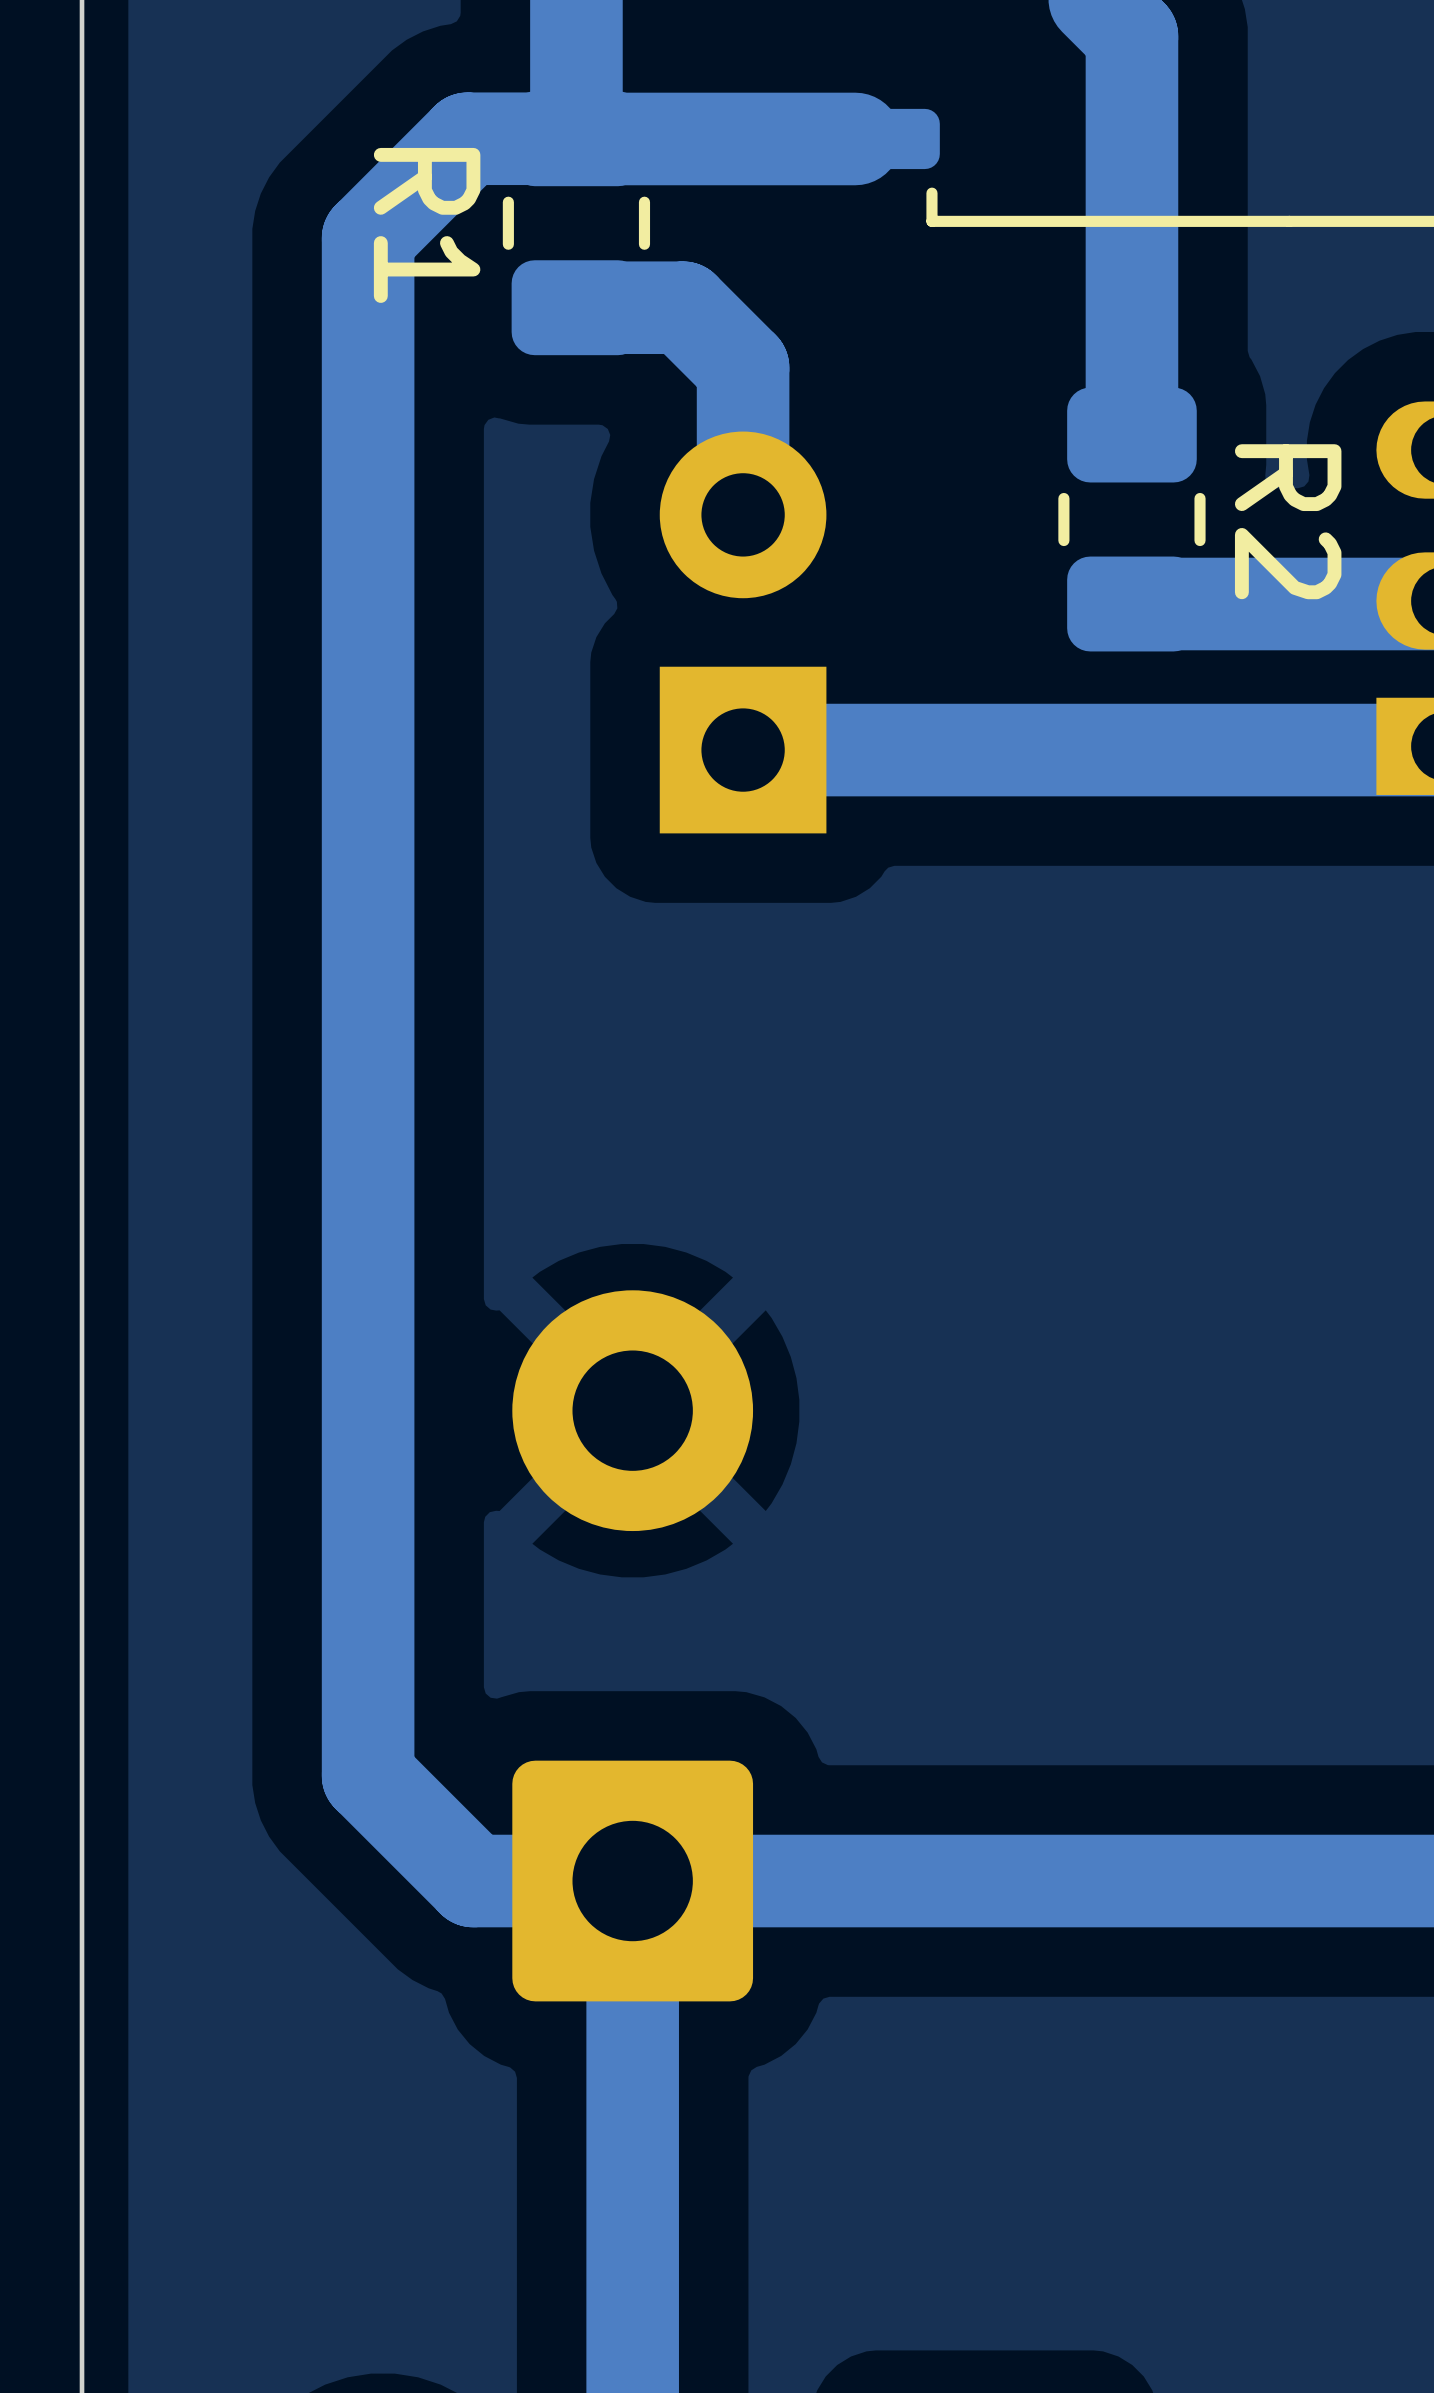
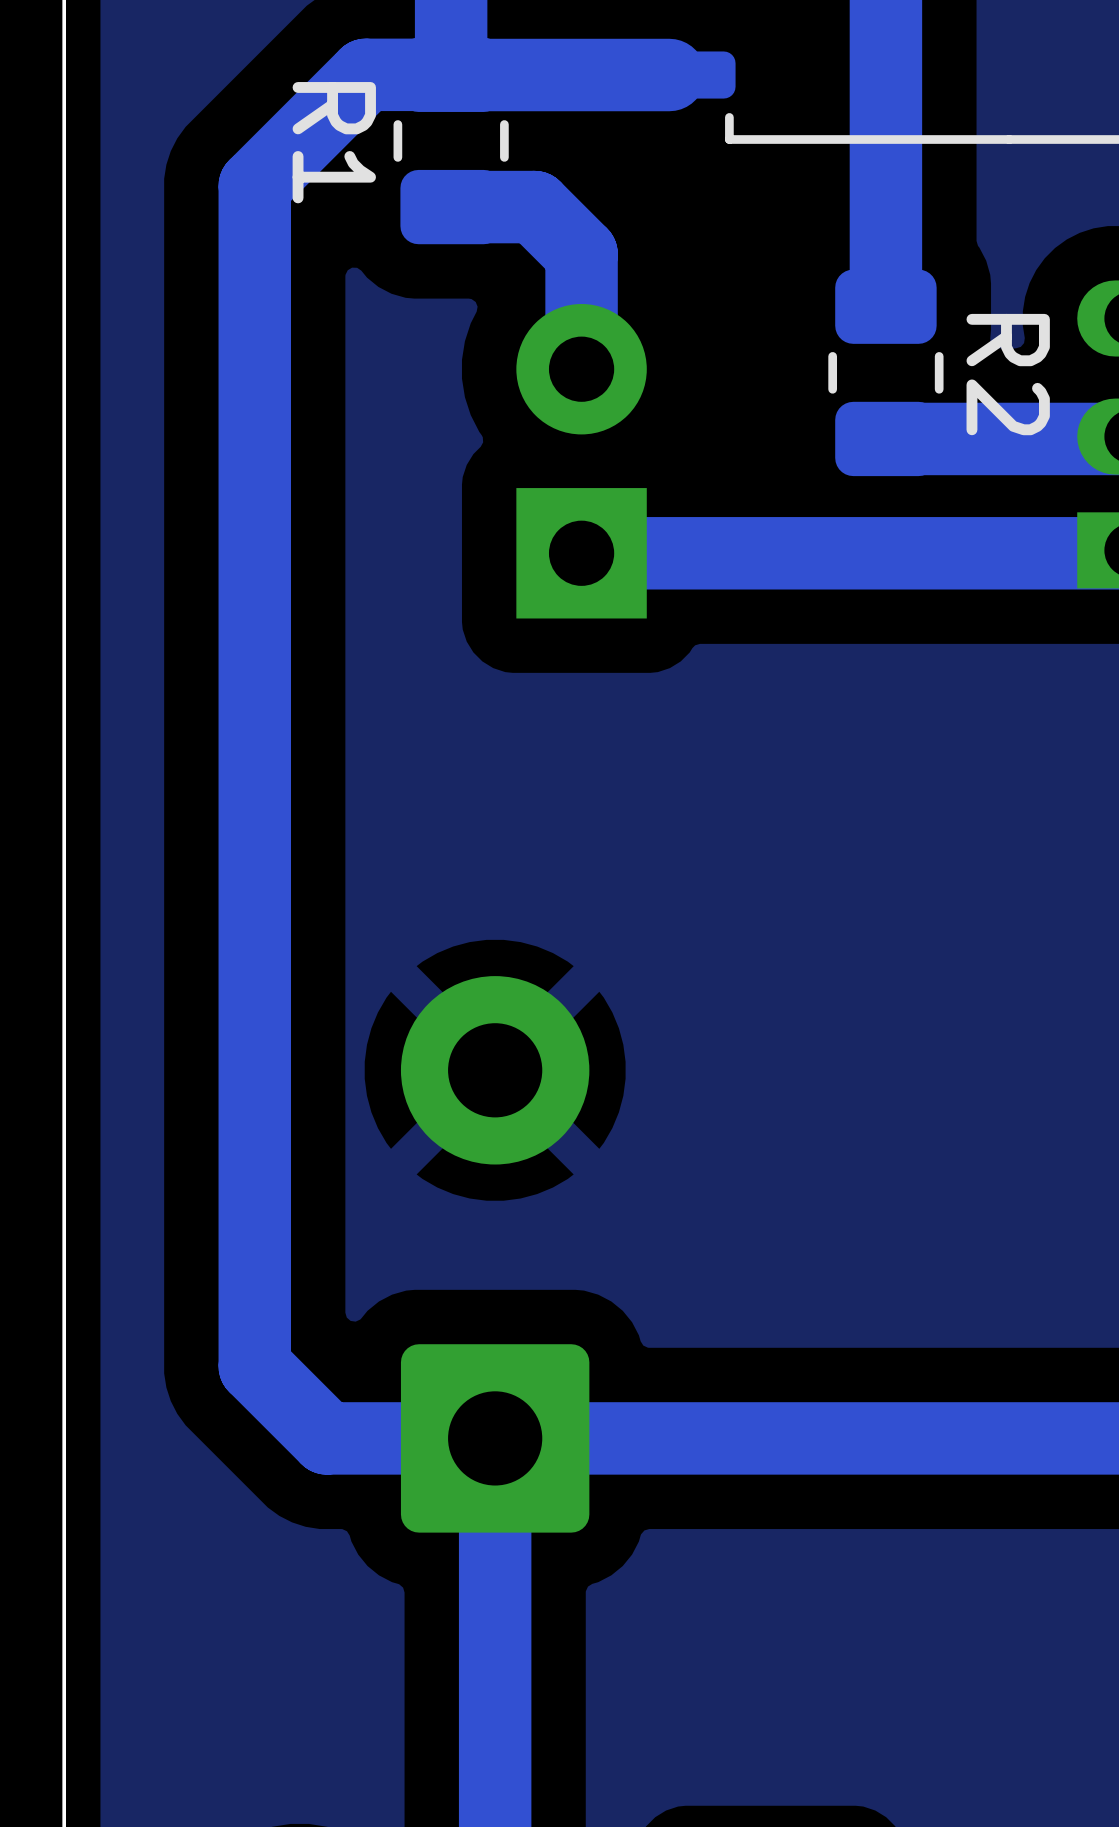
bottom track: (368, 238) (368, 1775) (473, 1881) -> (288, 152) (254, 185) (254, 1366) (326, 1438) (370, 1438)

